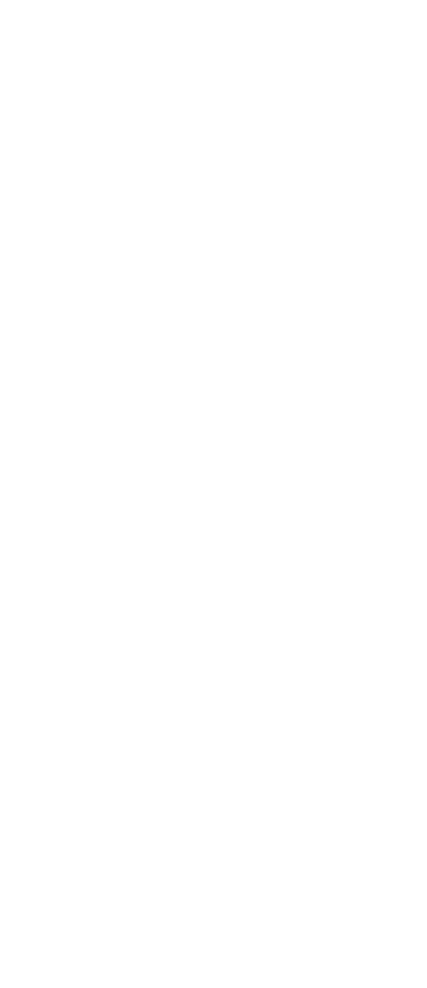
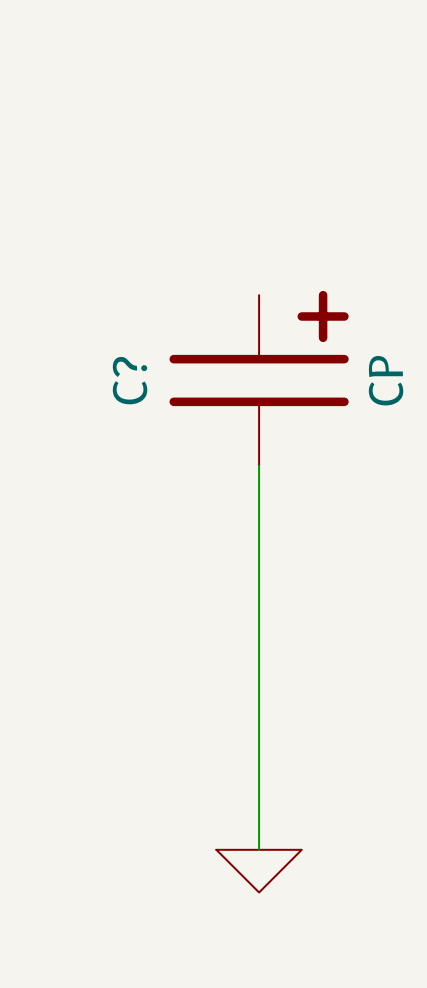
C?: none -> CP (259, 378)
wire: none -> (259, 465) (259, 849)
power symbol: none -> (259, 871)

